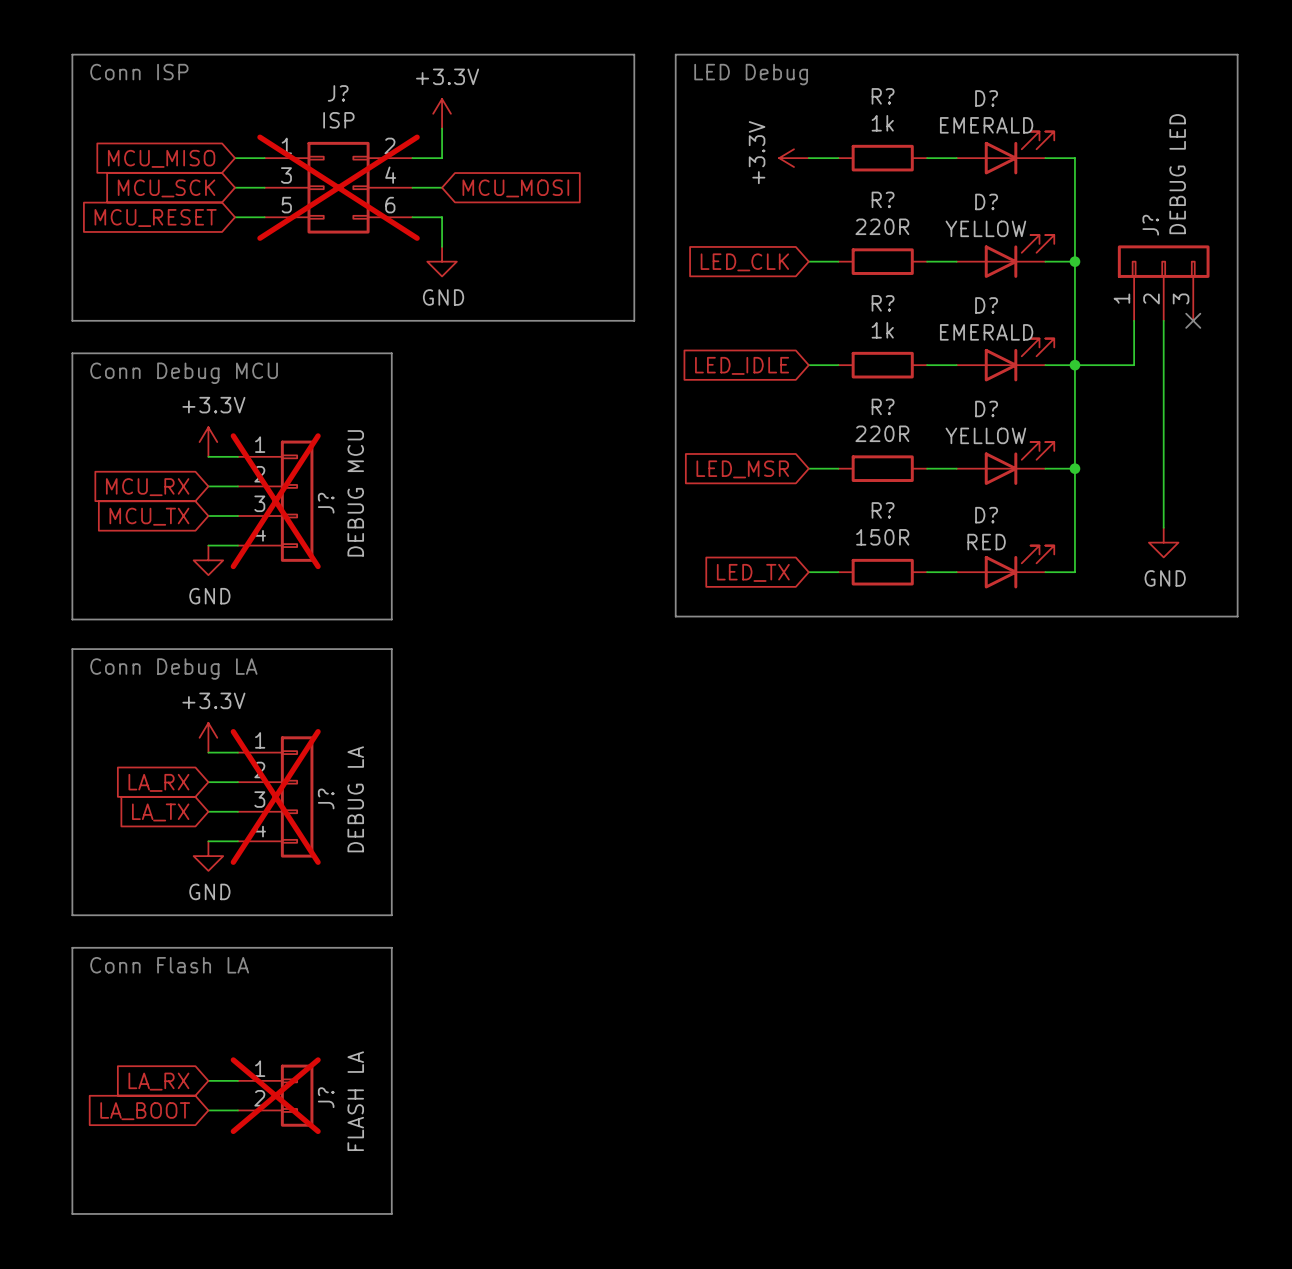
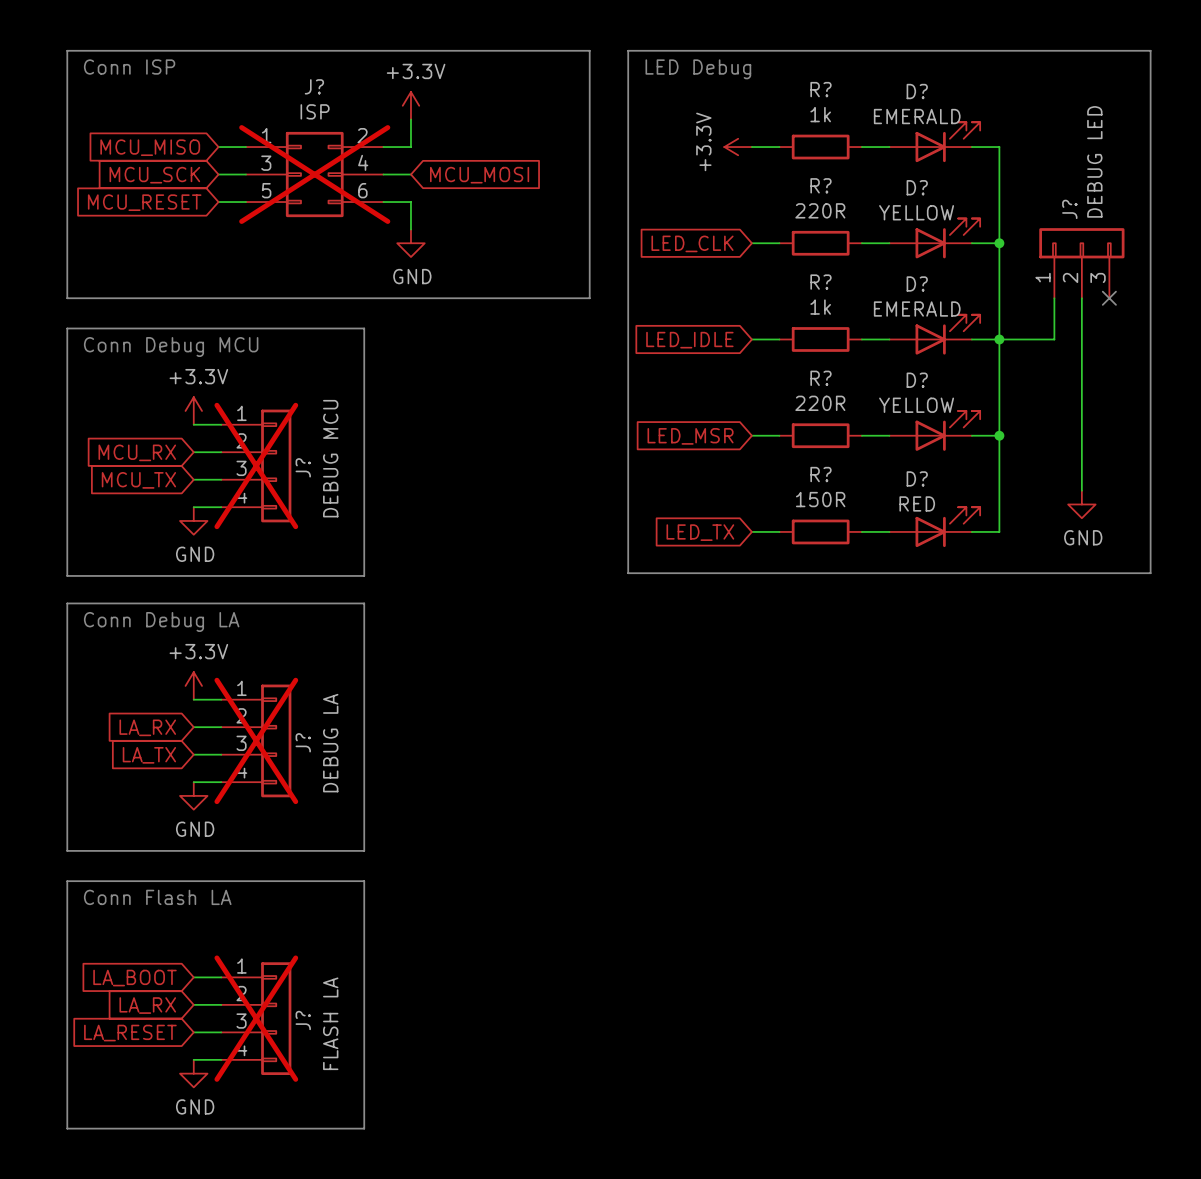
wire: none -> (193, 977) (221, 977)
global label: none -> LA_BOOT (134, 978)
J? symbol: [237, 1064, 314, 1127] -> [221, 962, 292, 1076]
global label: LA_BOOT (145, 1111) -> LA_RESET (130, 1033)
wire: none -> (193, 1059) (221, 1059)
power symbol: none -> GND (193, 1073)

